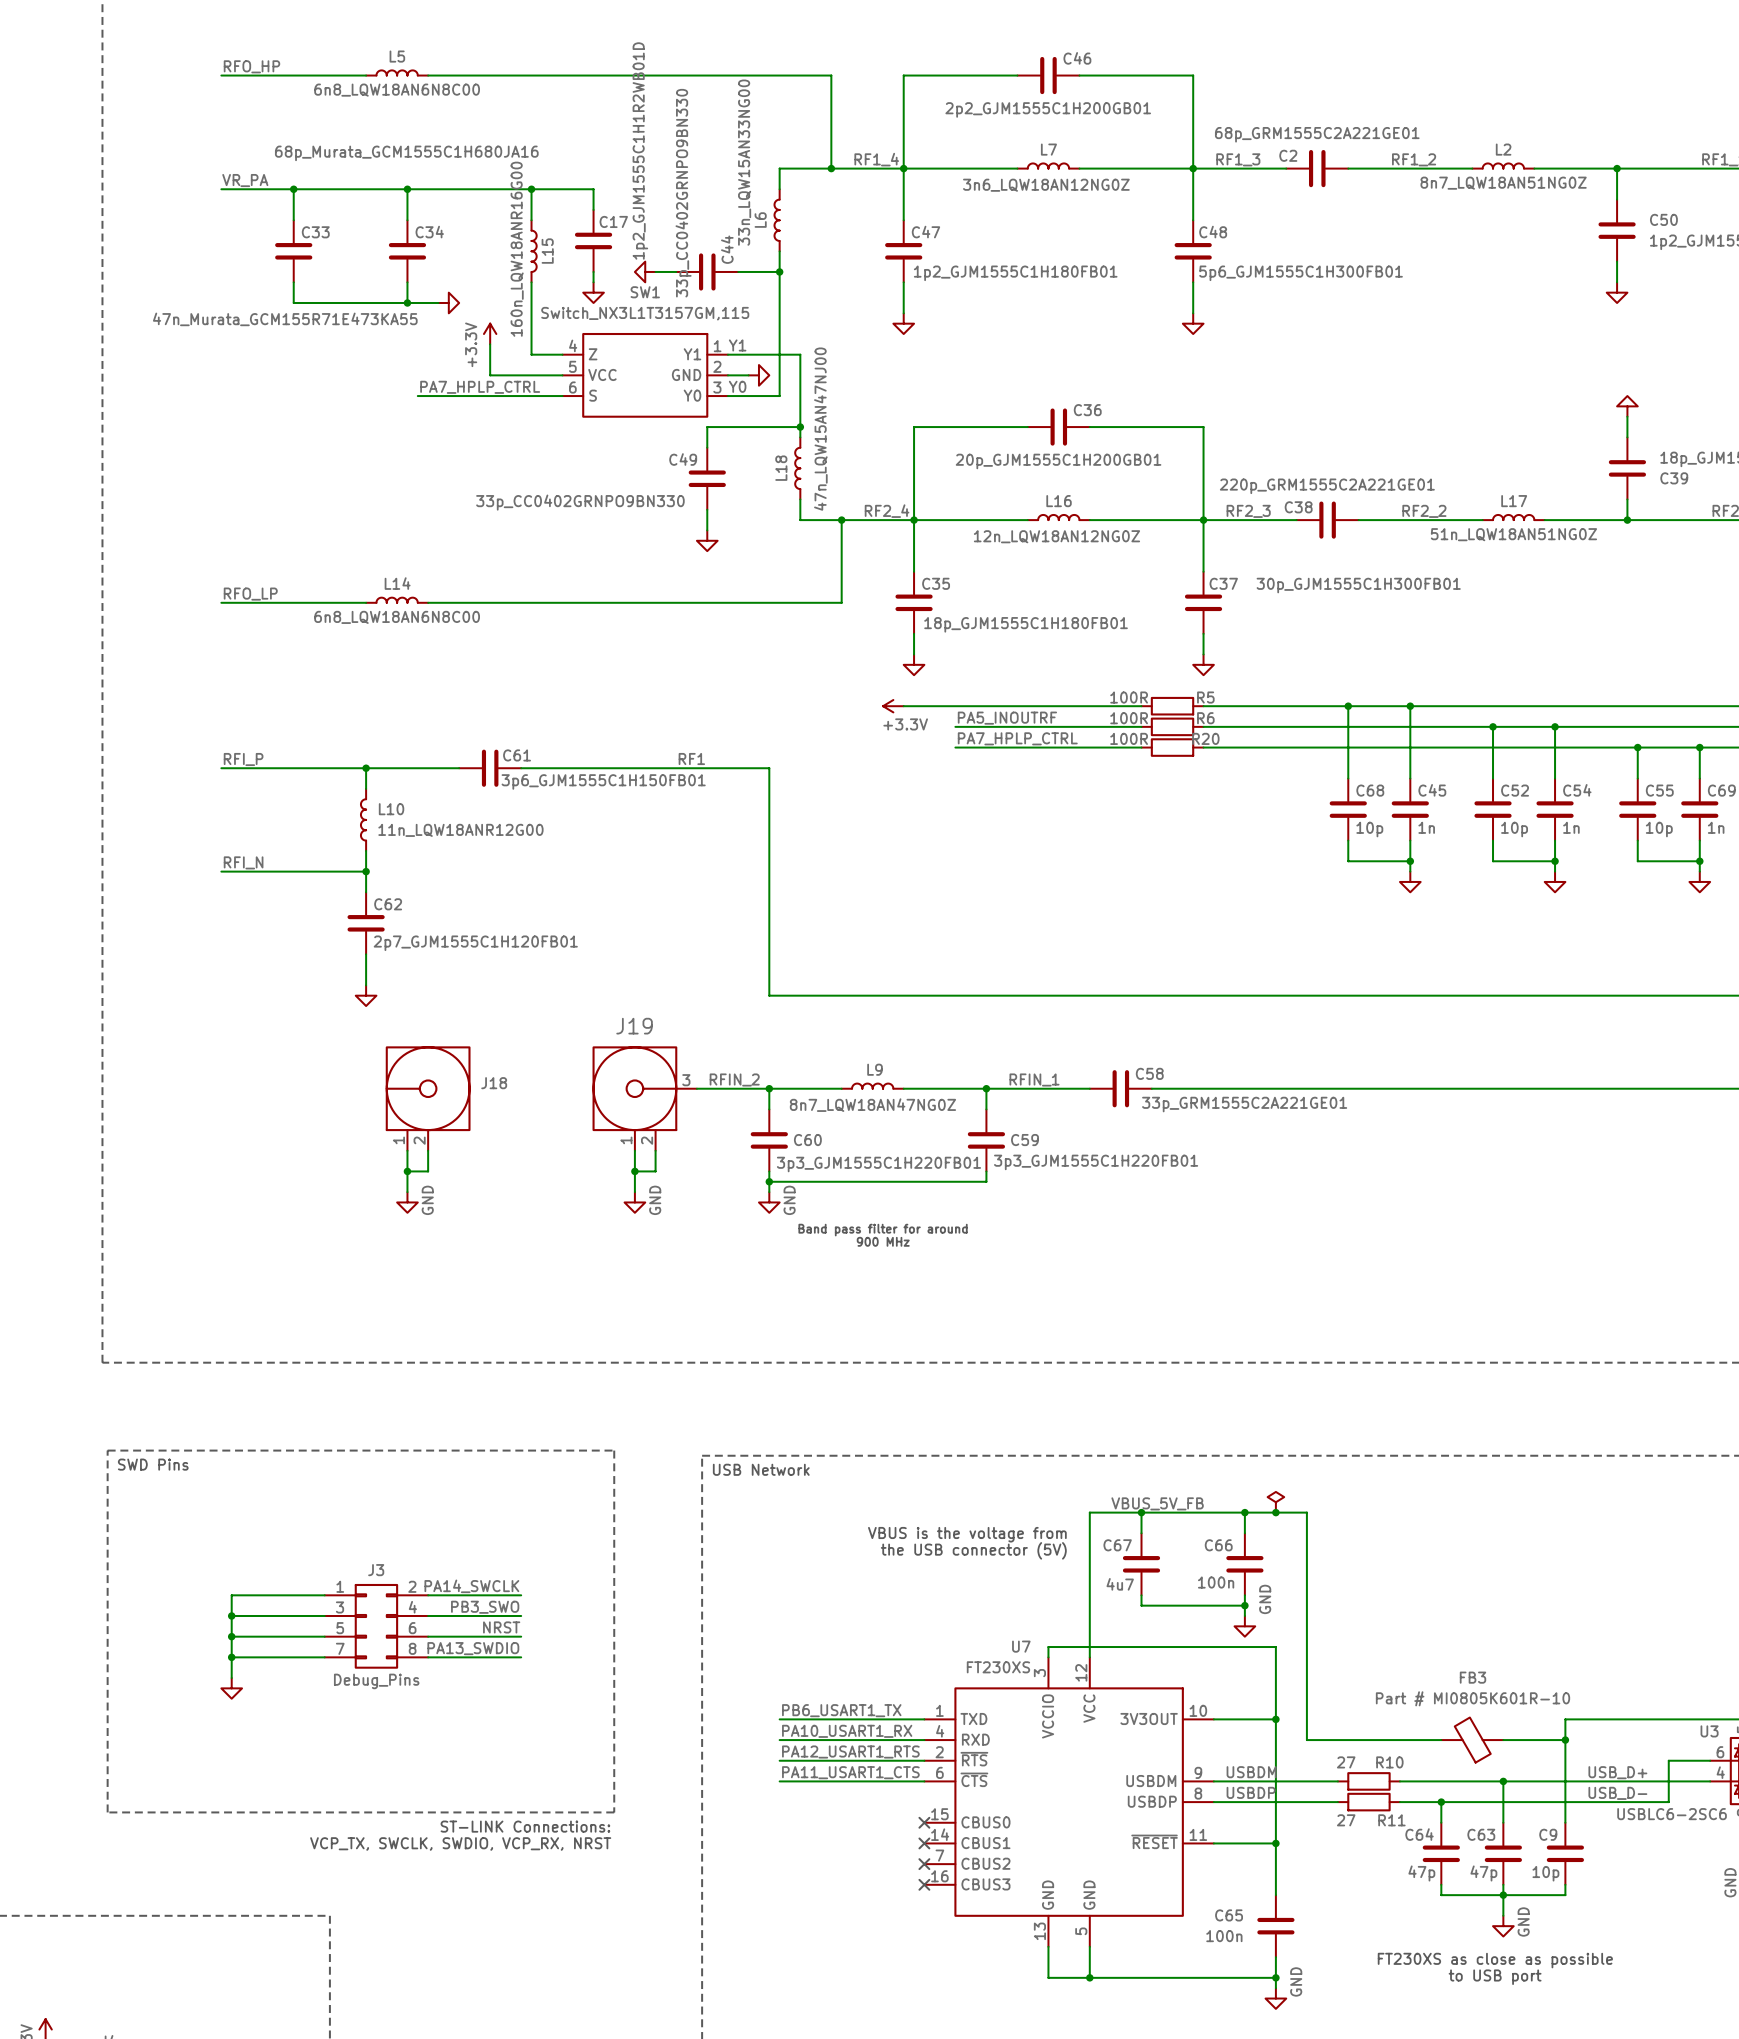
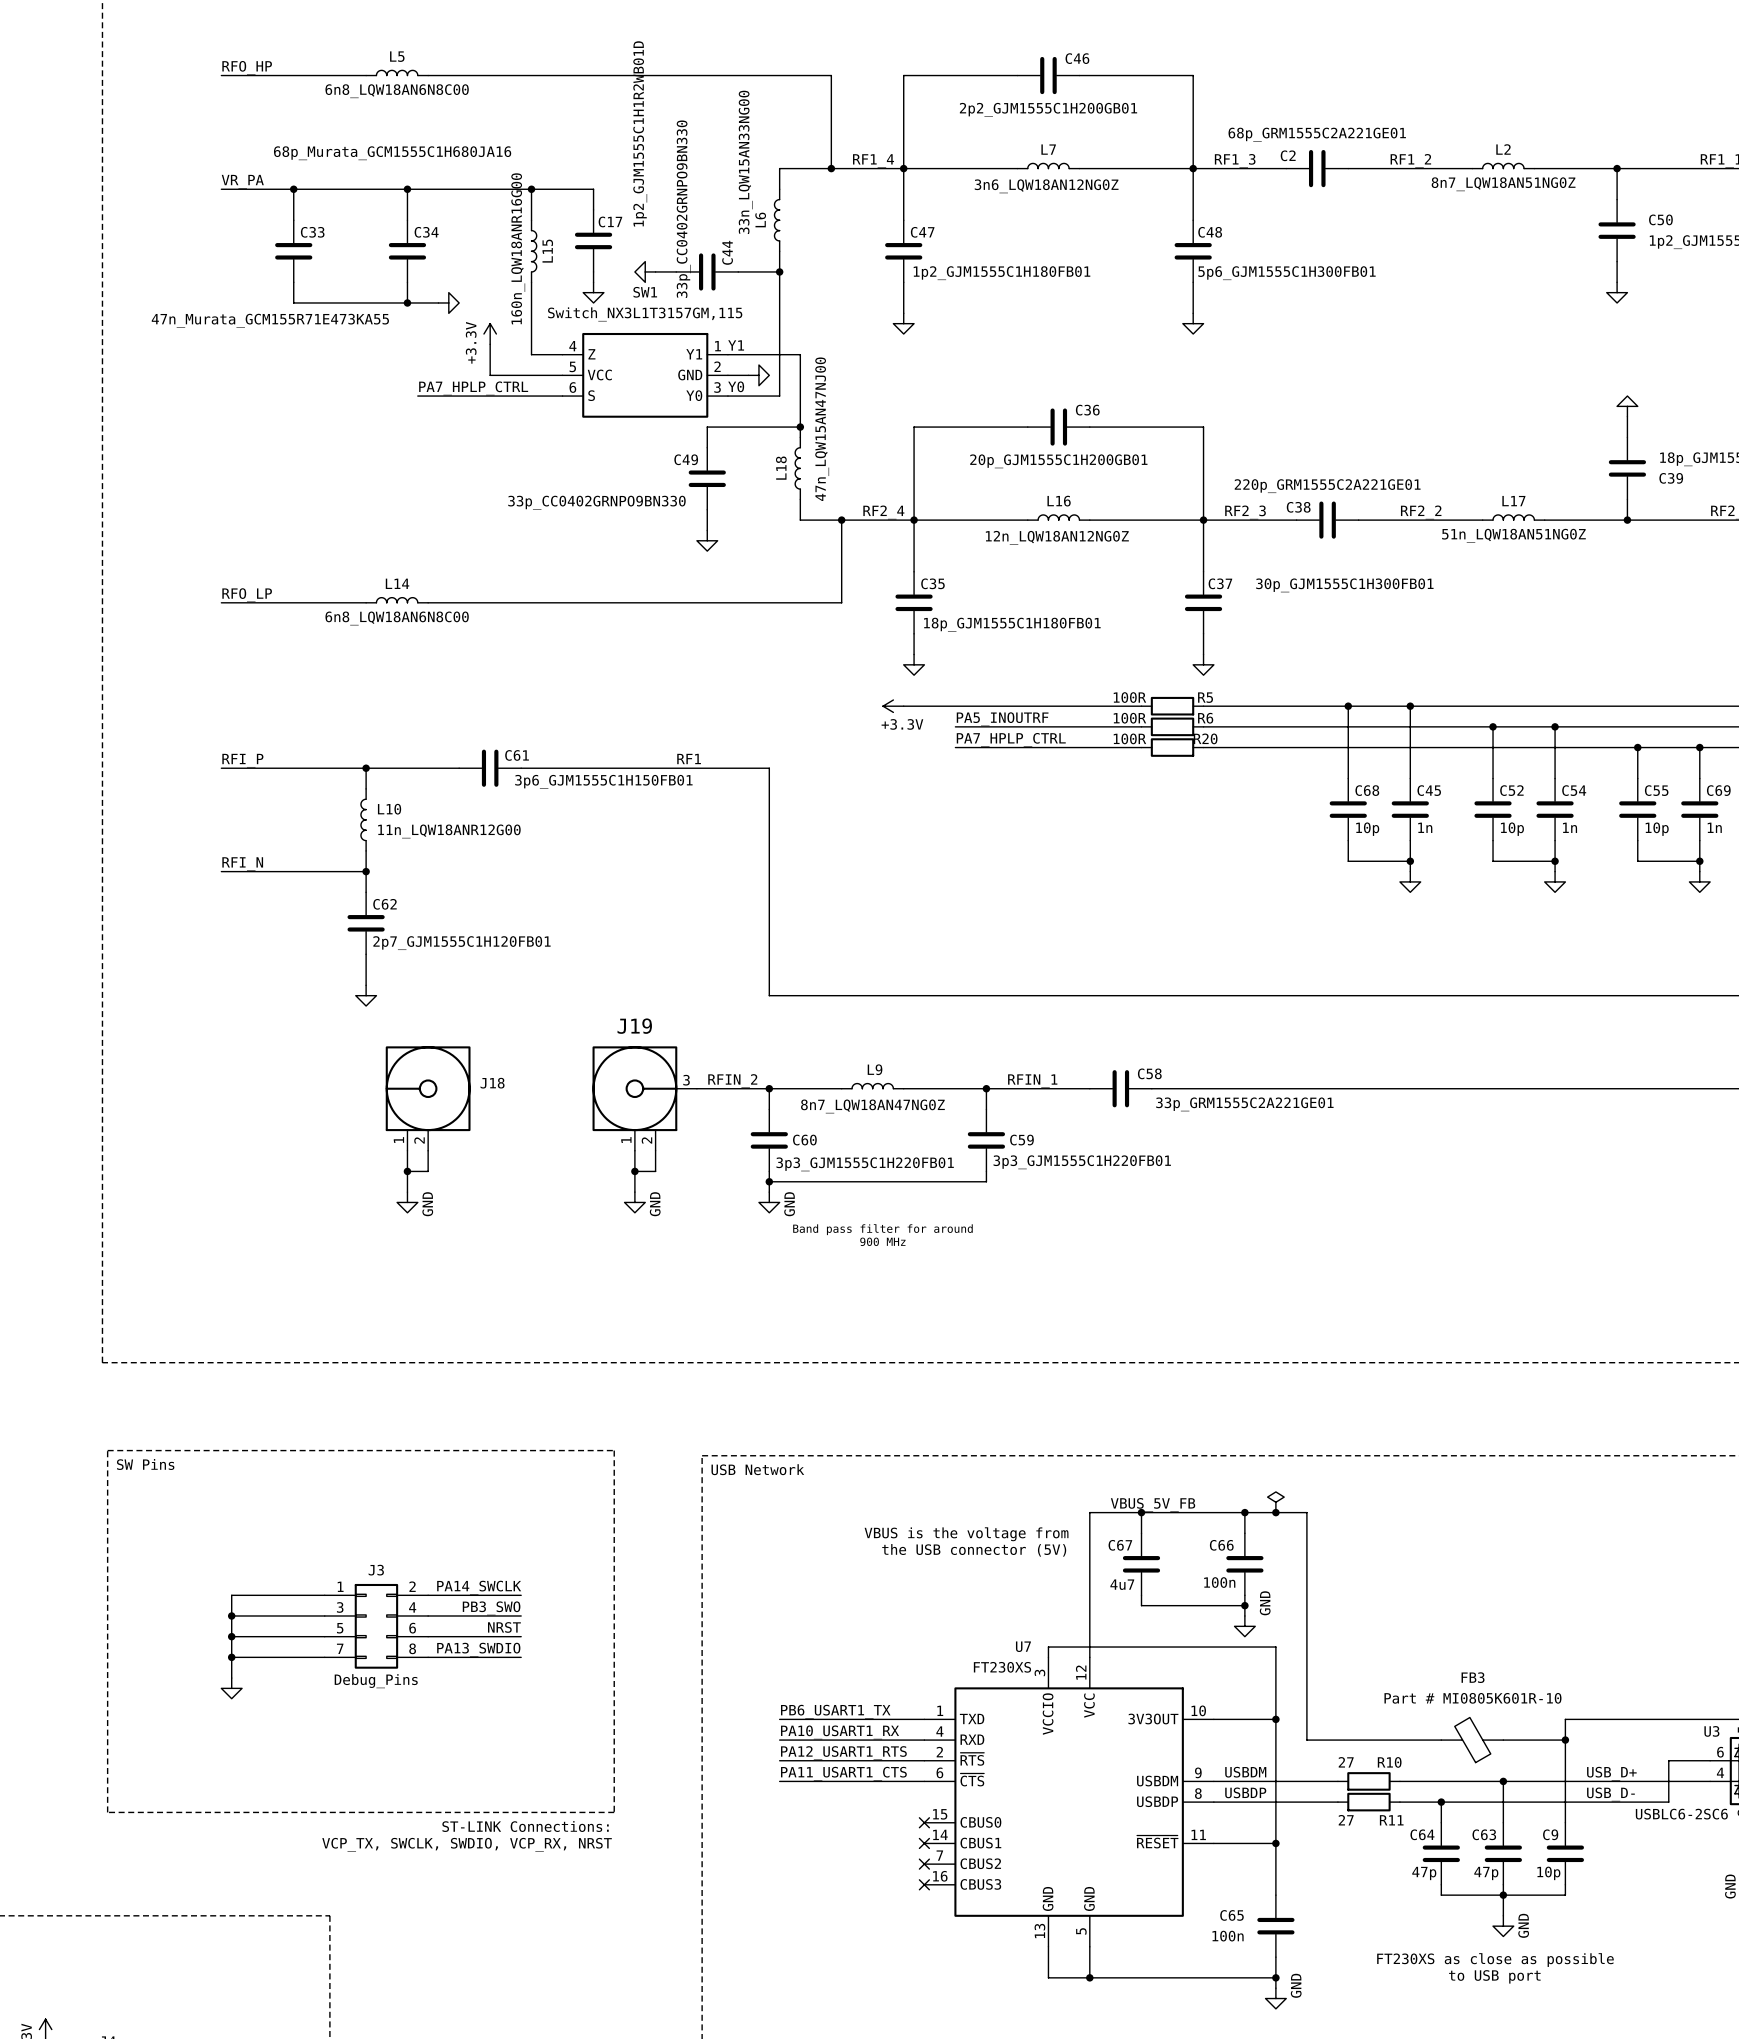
text: SWD Pins (153, 1464) -> SW Pins (145, 1464)

